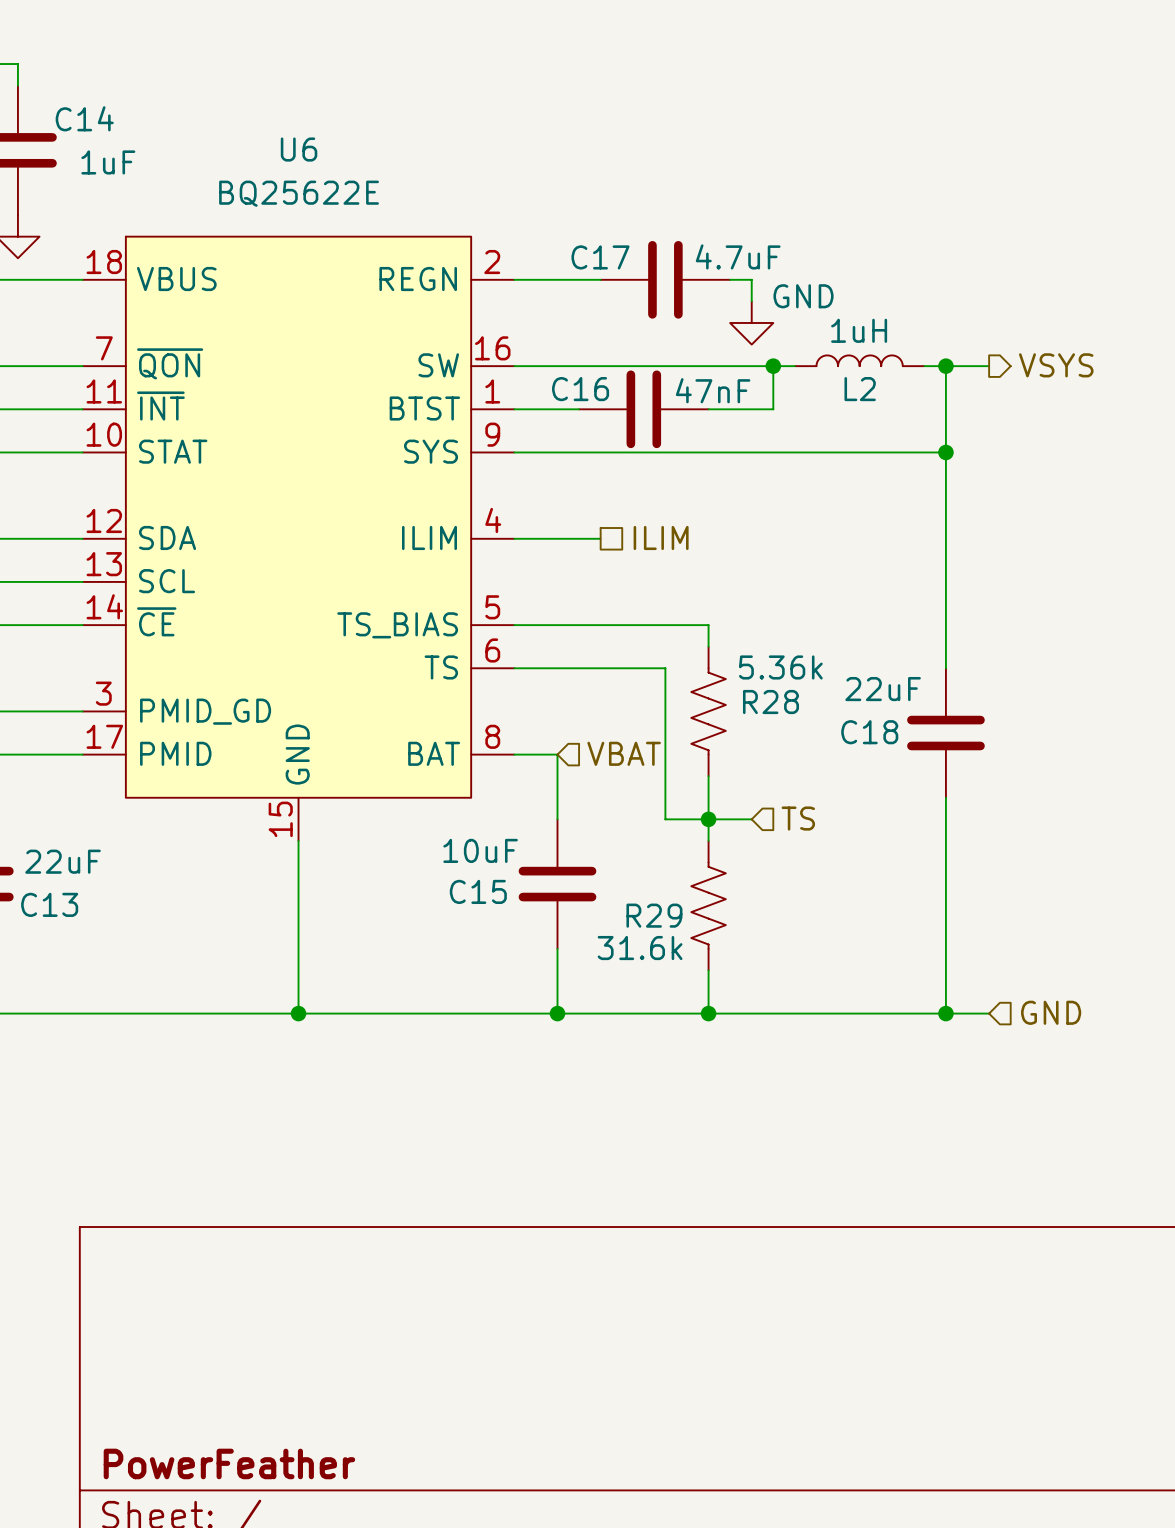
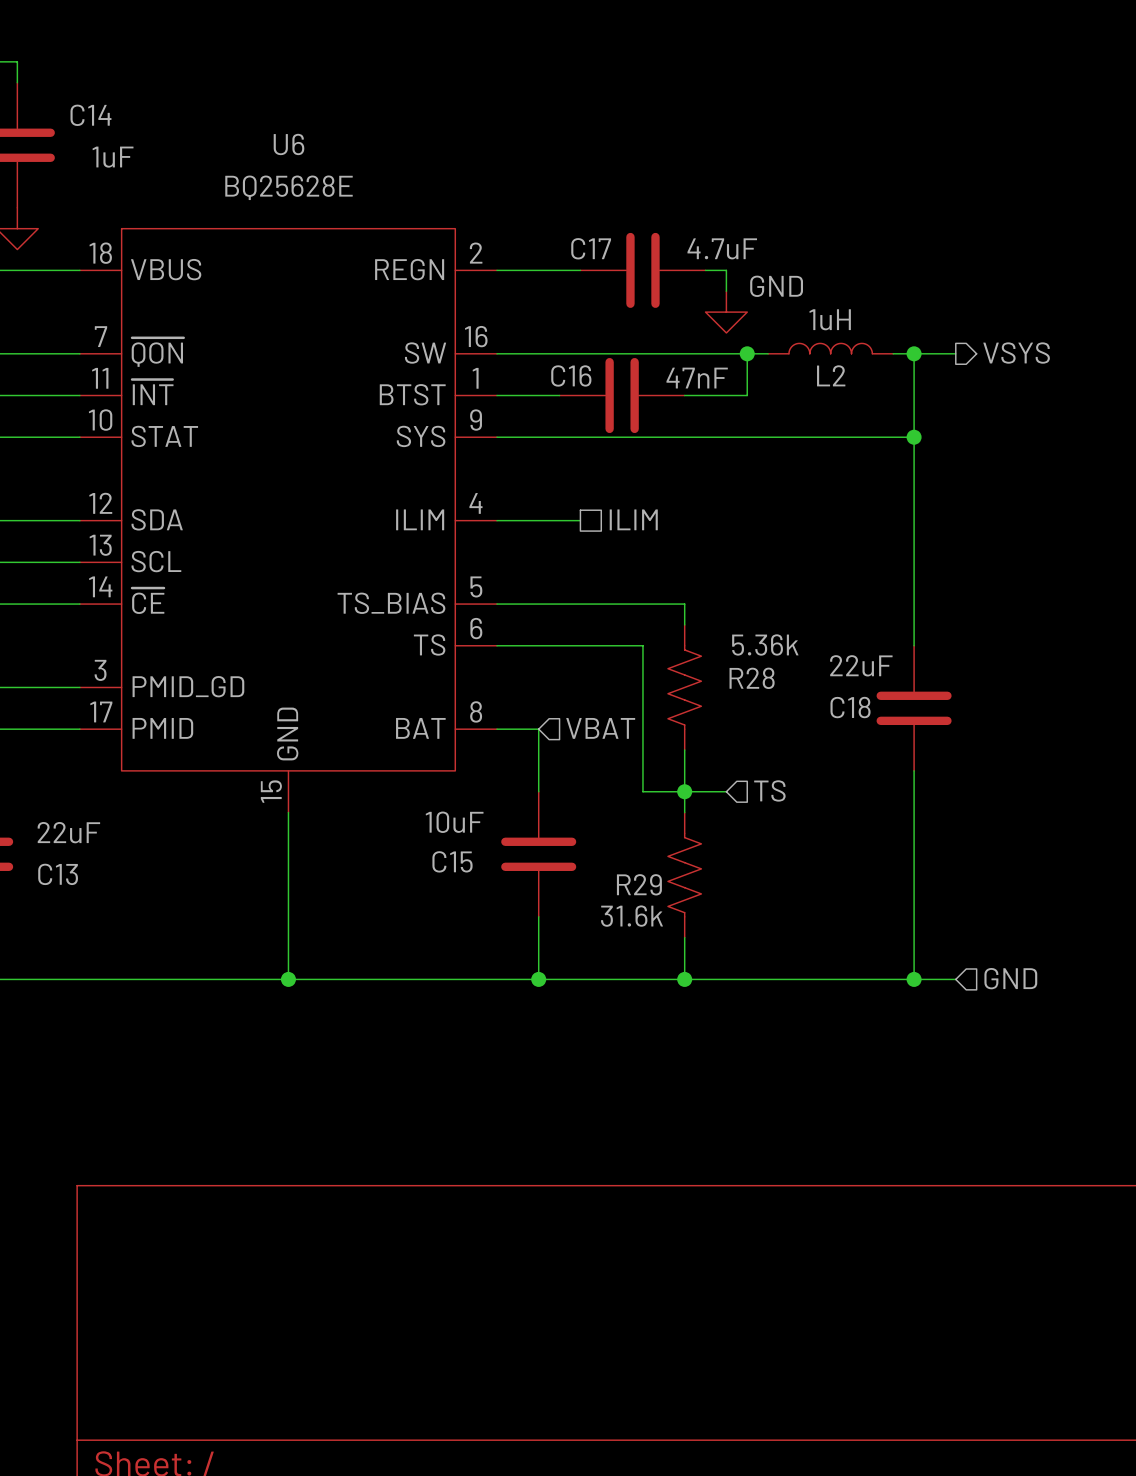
U6 value: BQ25622E (299, 193) -> BQ25628E (289, 187)
title block: PowerFeather (229, 1463) -> none

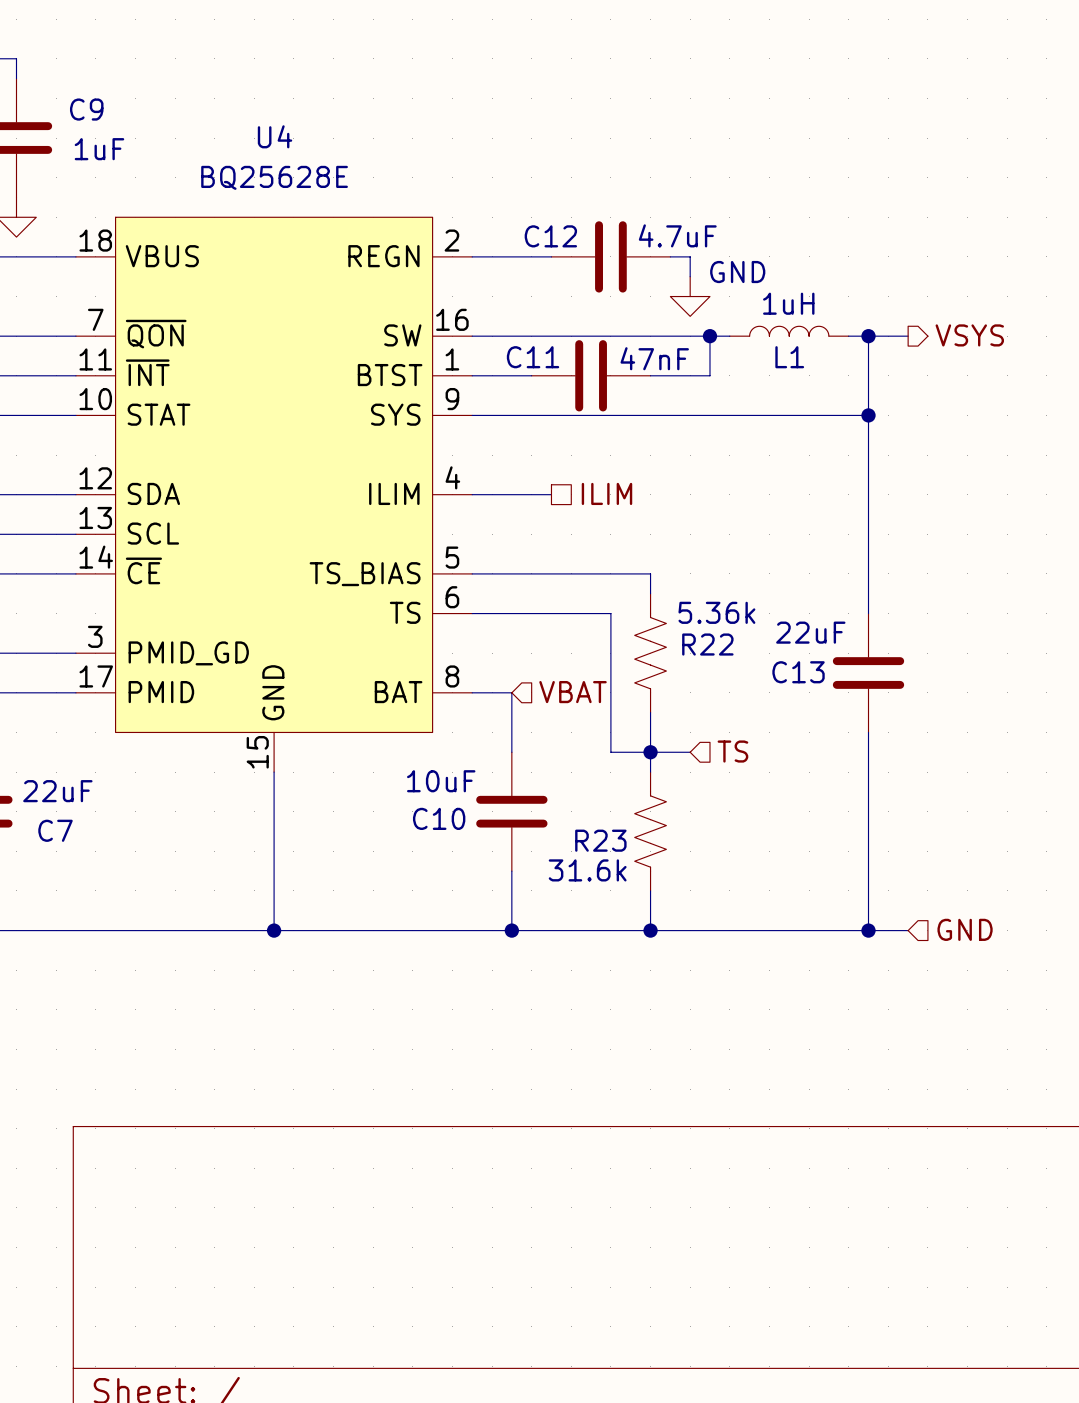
C14 name: C14 (90, 115) -> C9 (86, 109)
U6 name: U6 (289, 144) -> U4 (275, 136)
C17 name: C17 (591, 248) -> C12 (550, 236)
C16 name: C16 (571, 375) -> C11 (533, 357)
L2 name: L2 (831, 375) -> L1 (789, 357)
R28 name: R28 (752, 678) -> R22 (707, 644)
C18 name: C18 (850, 707) -> C13 (798, 672)
C15 name: C15 (452, 861) -> C10 (439, 818)
C13 name: C13 (58, 874) -> C7 (55, 830)
R29 name: R29 (639, 884) -> R23 (600, 840)

